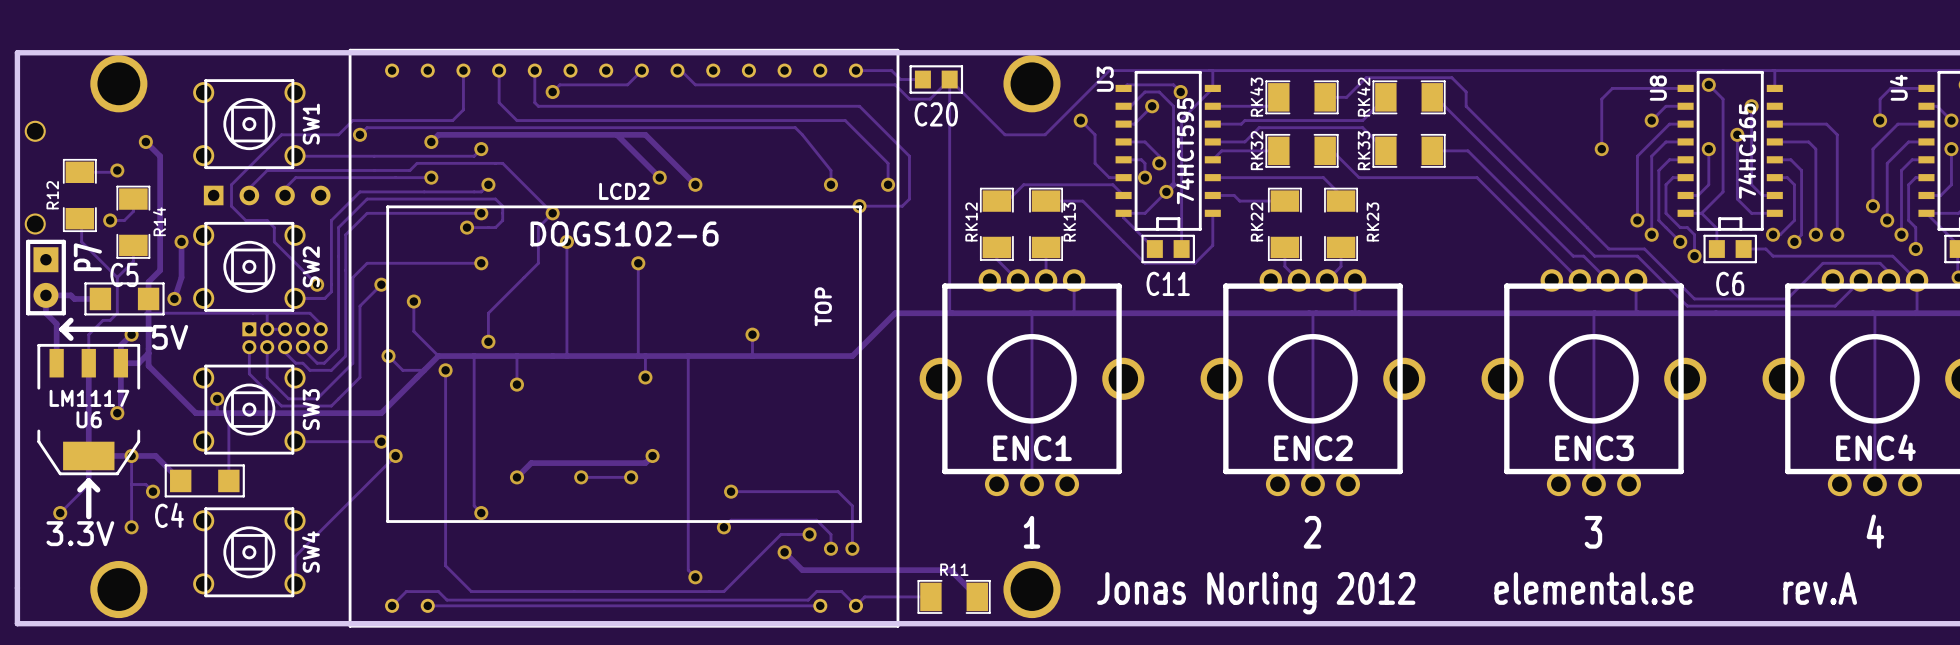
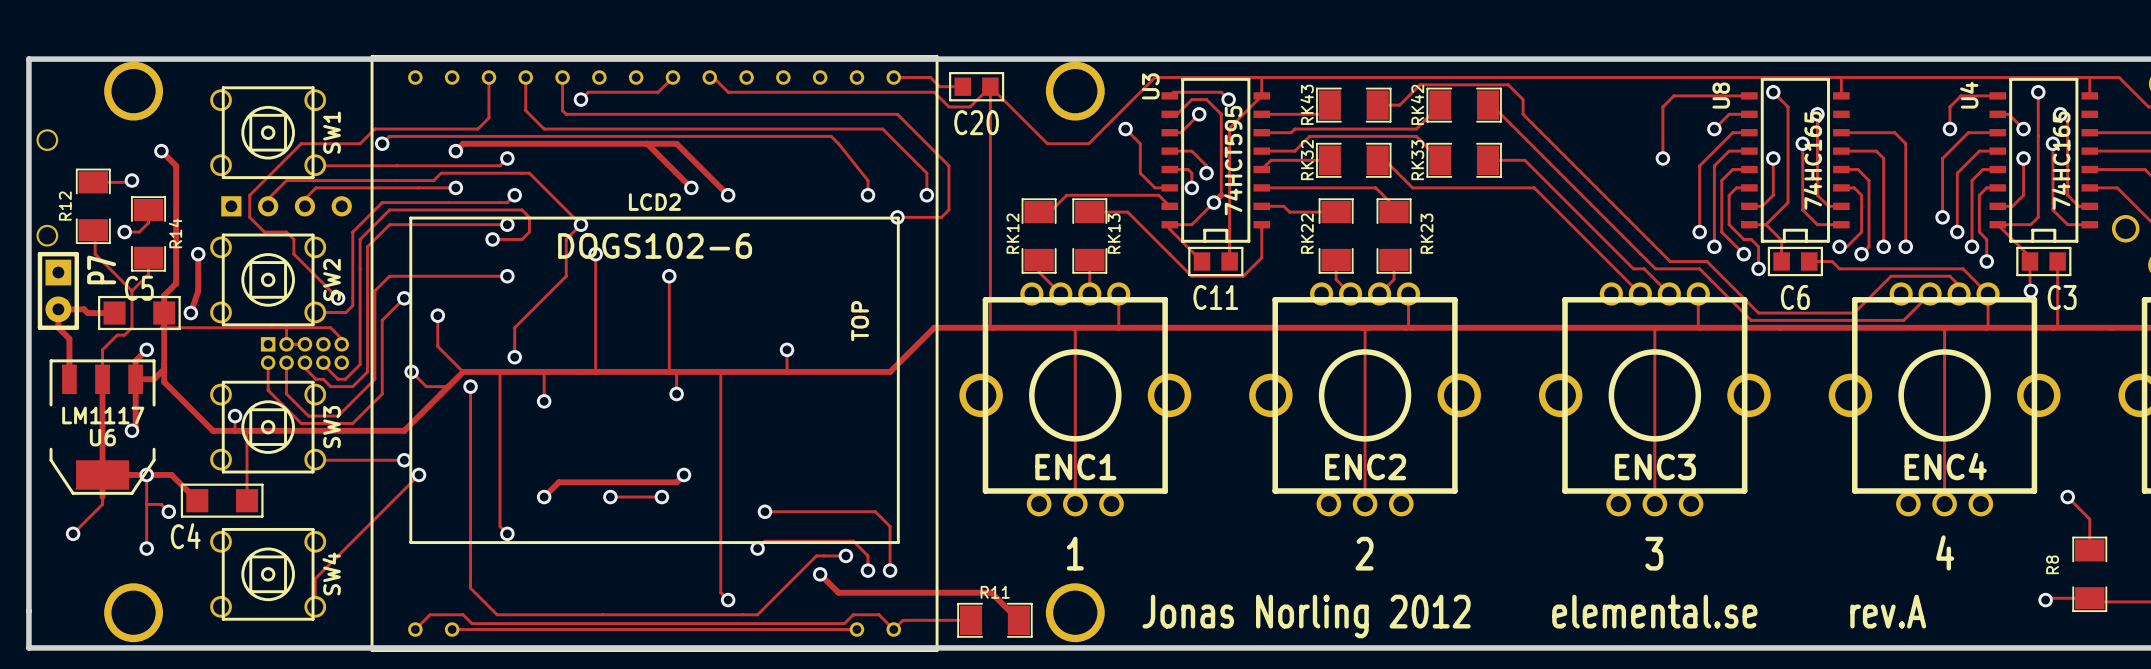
line: (70, 320) (62, 329) -> none
line: (62, 329) (70, 338) -> none
line: (62, 329) (151, 329) -> none
text: 5V (170, 337) -> none
line: (88, 480) (97, 489) -> none
line: (88, 480) (79, 489) -> none
line: (88, 480) (88, 516) -> none
text: 3.3V (80, 533) -> none

